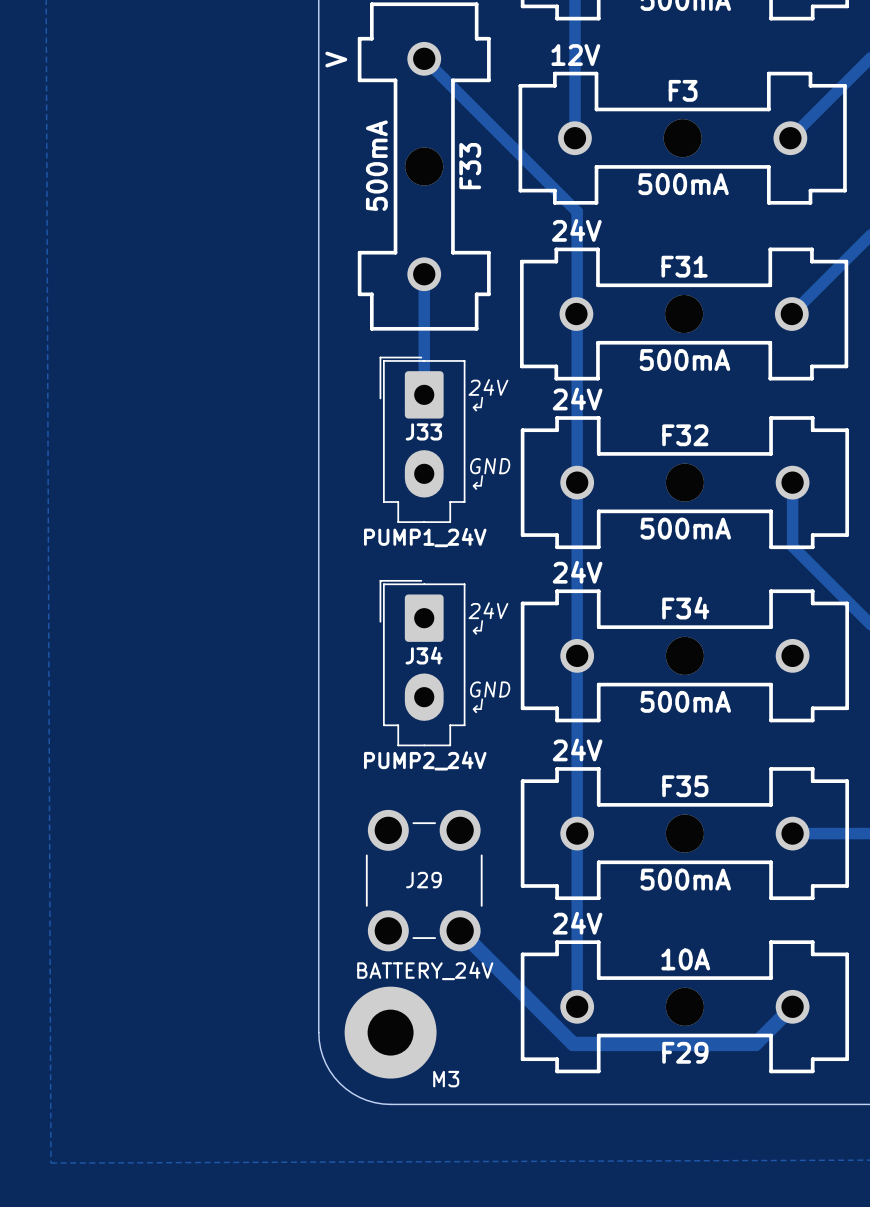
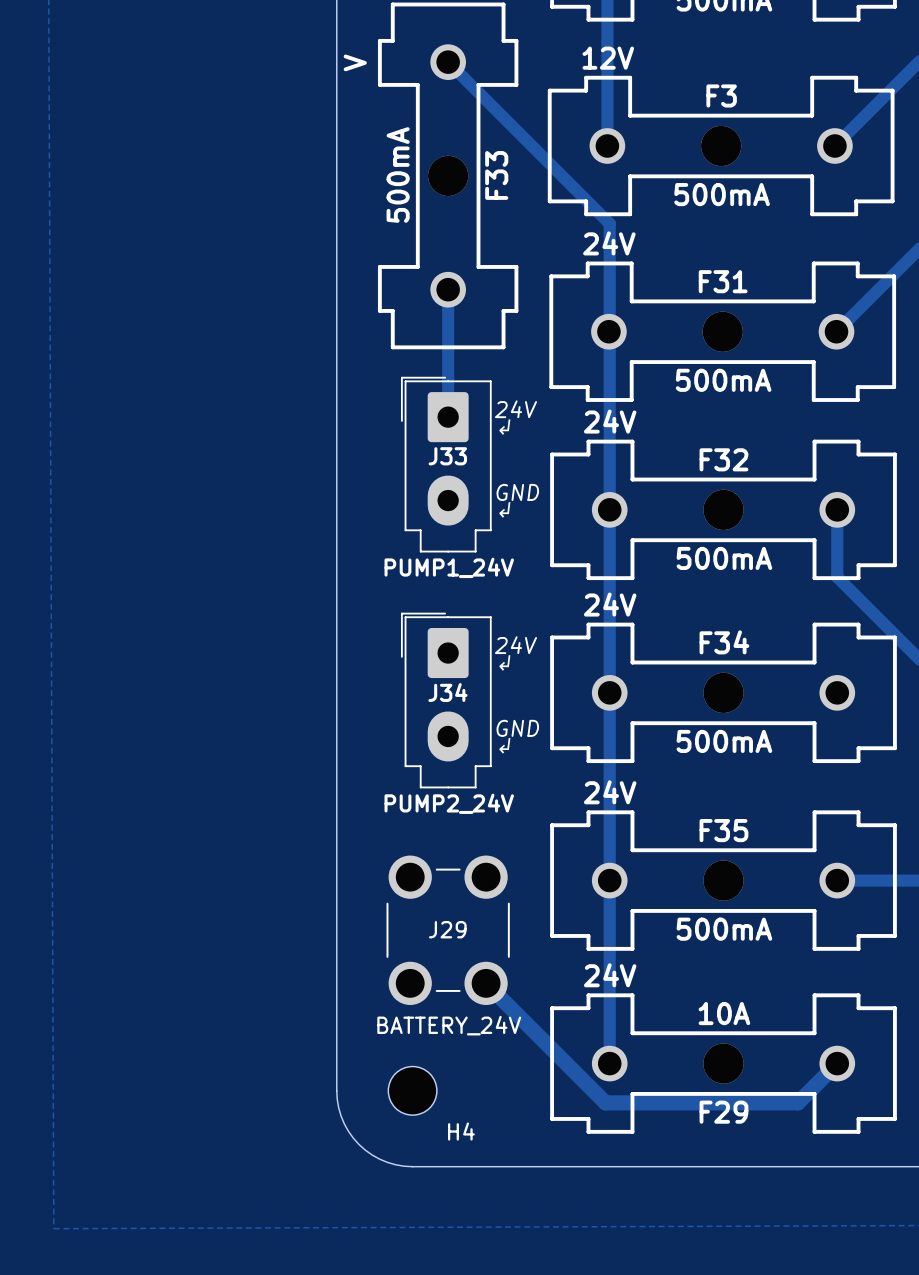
M3: (390, 1032) -> none
H4: none -> (412, 1090)

